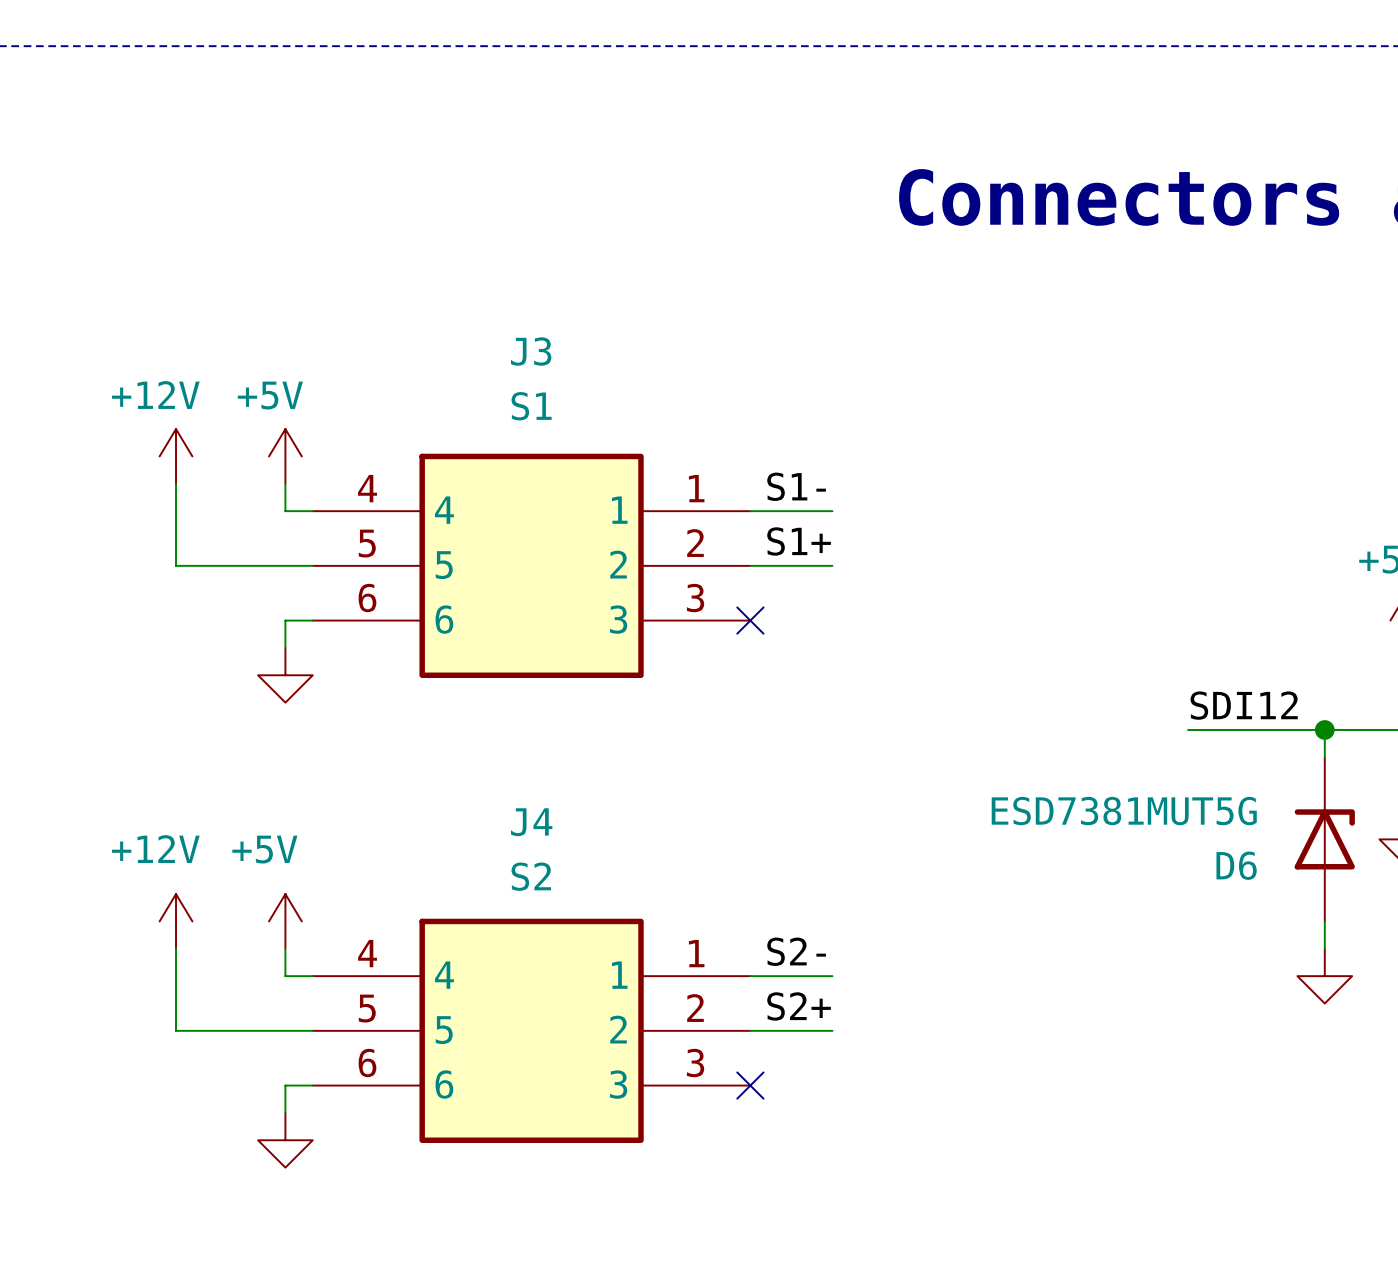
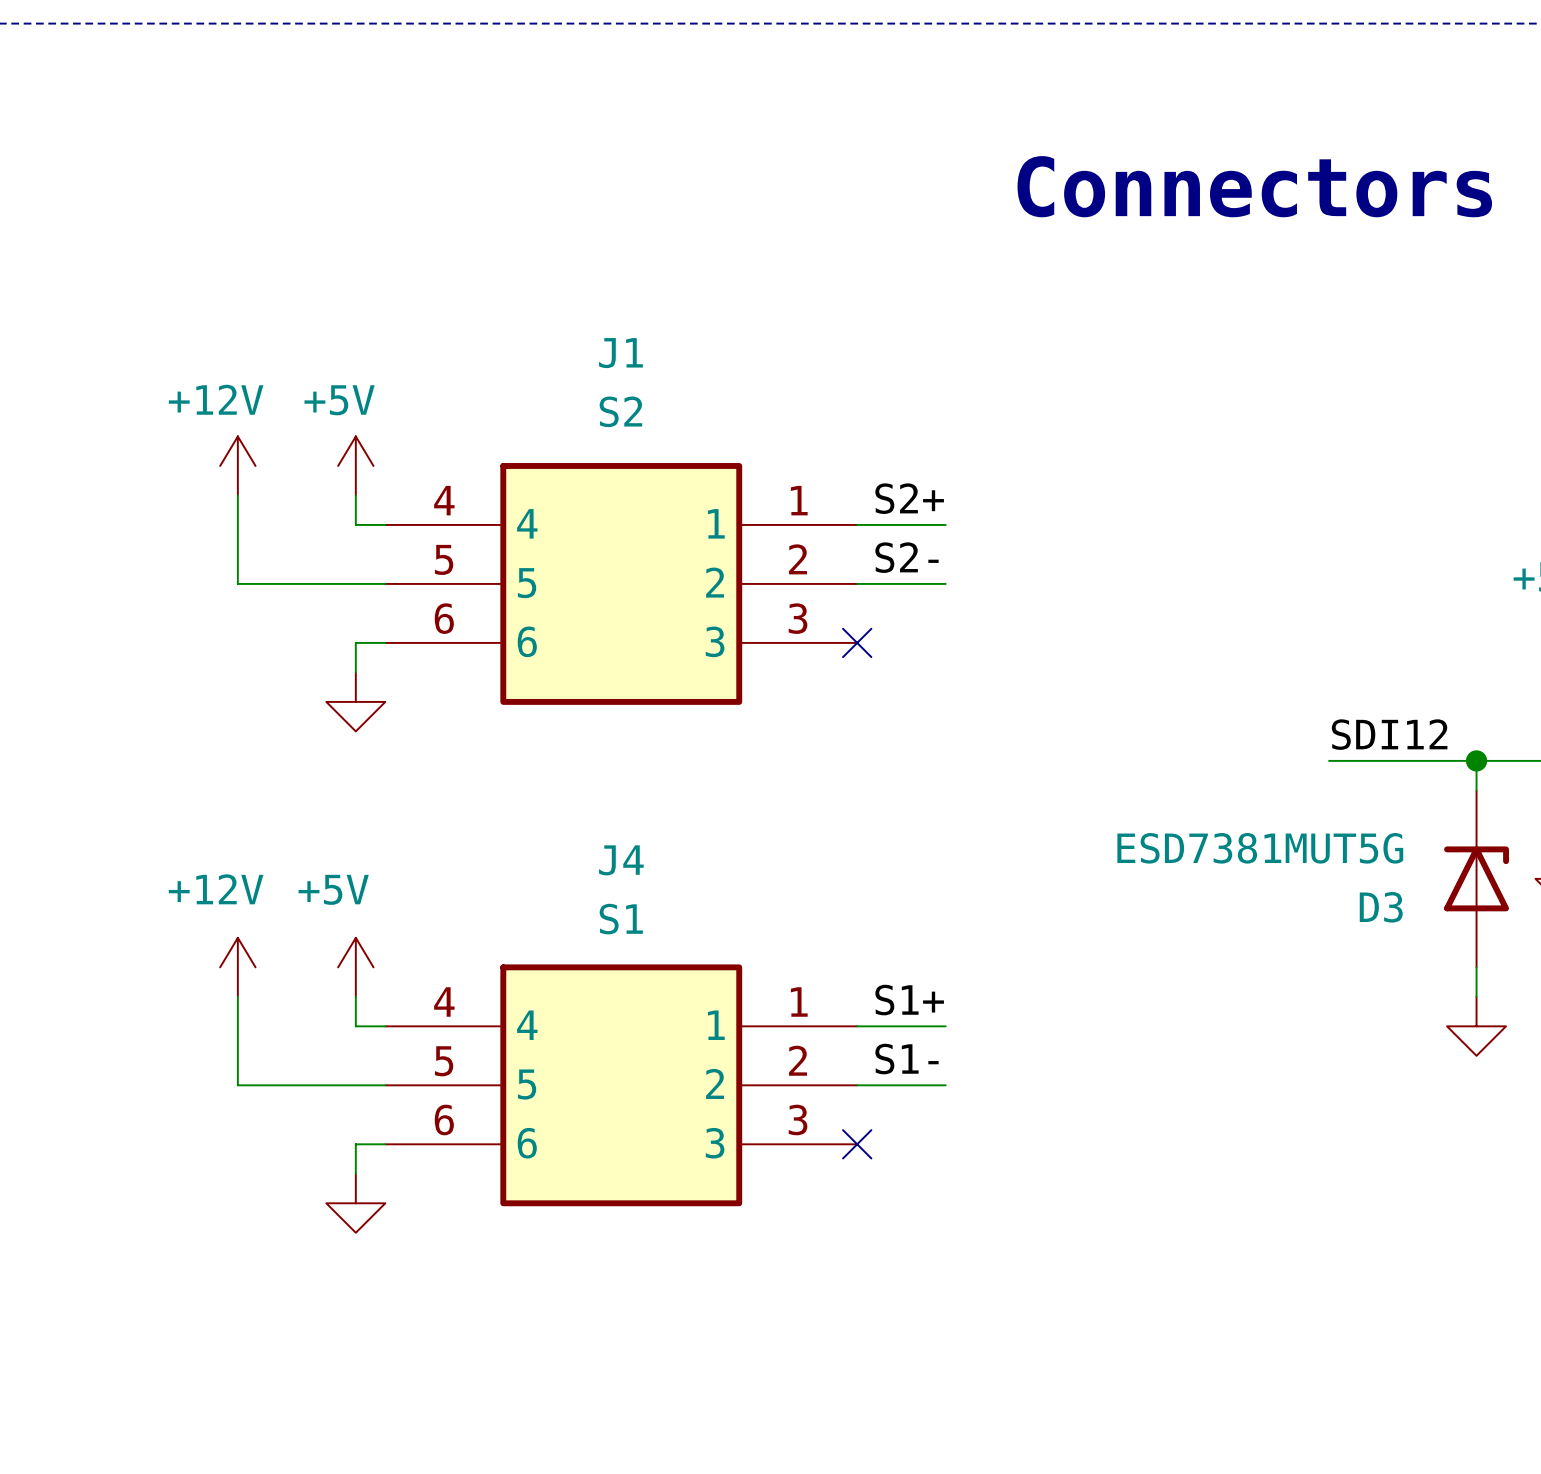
J3 name: J3 (531, 351) -> J1 (620, 353)
J3 value: S1 (531, 406) -> S2 (620, 411)
label: S1- (796, 486) -> S2+ (909, 498)
label: S1+ (799, 541) -> S2- (907, 557)
D6 name: D6 (1236, 865) -> D3 (1381, 907)
J4 value: S2 (531, 876) -> S1 (621, 919)
label: S2- (796, 951) -> S1+ (909, 1000)
label: S2+ (799, 1006) -> S1- (907, 1059)

